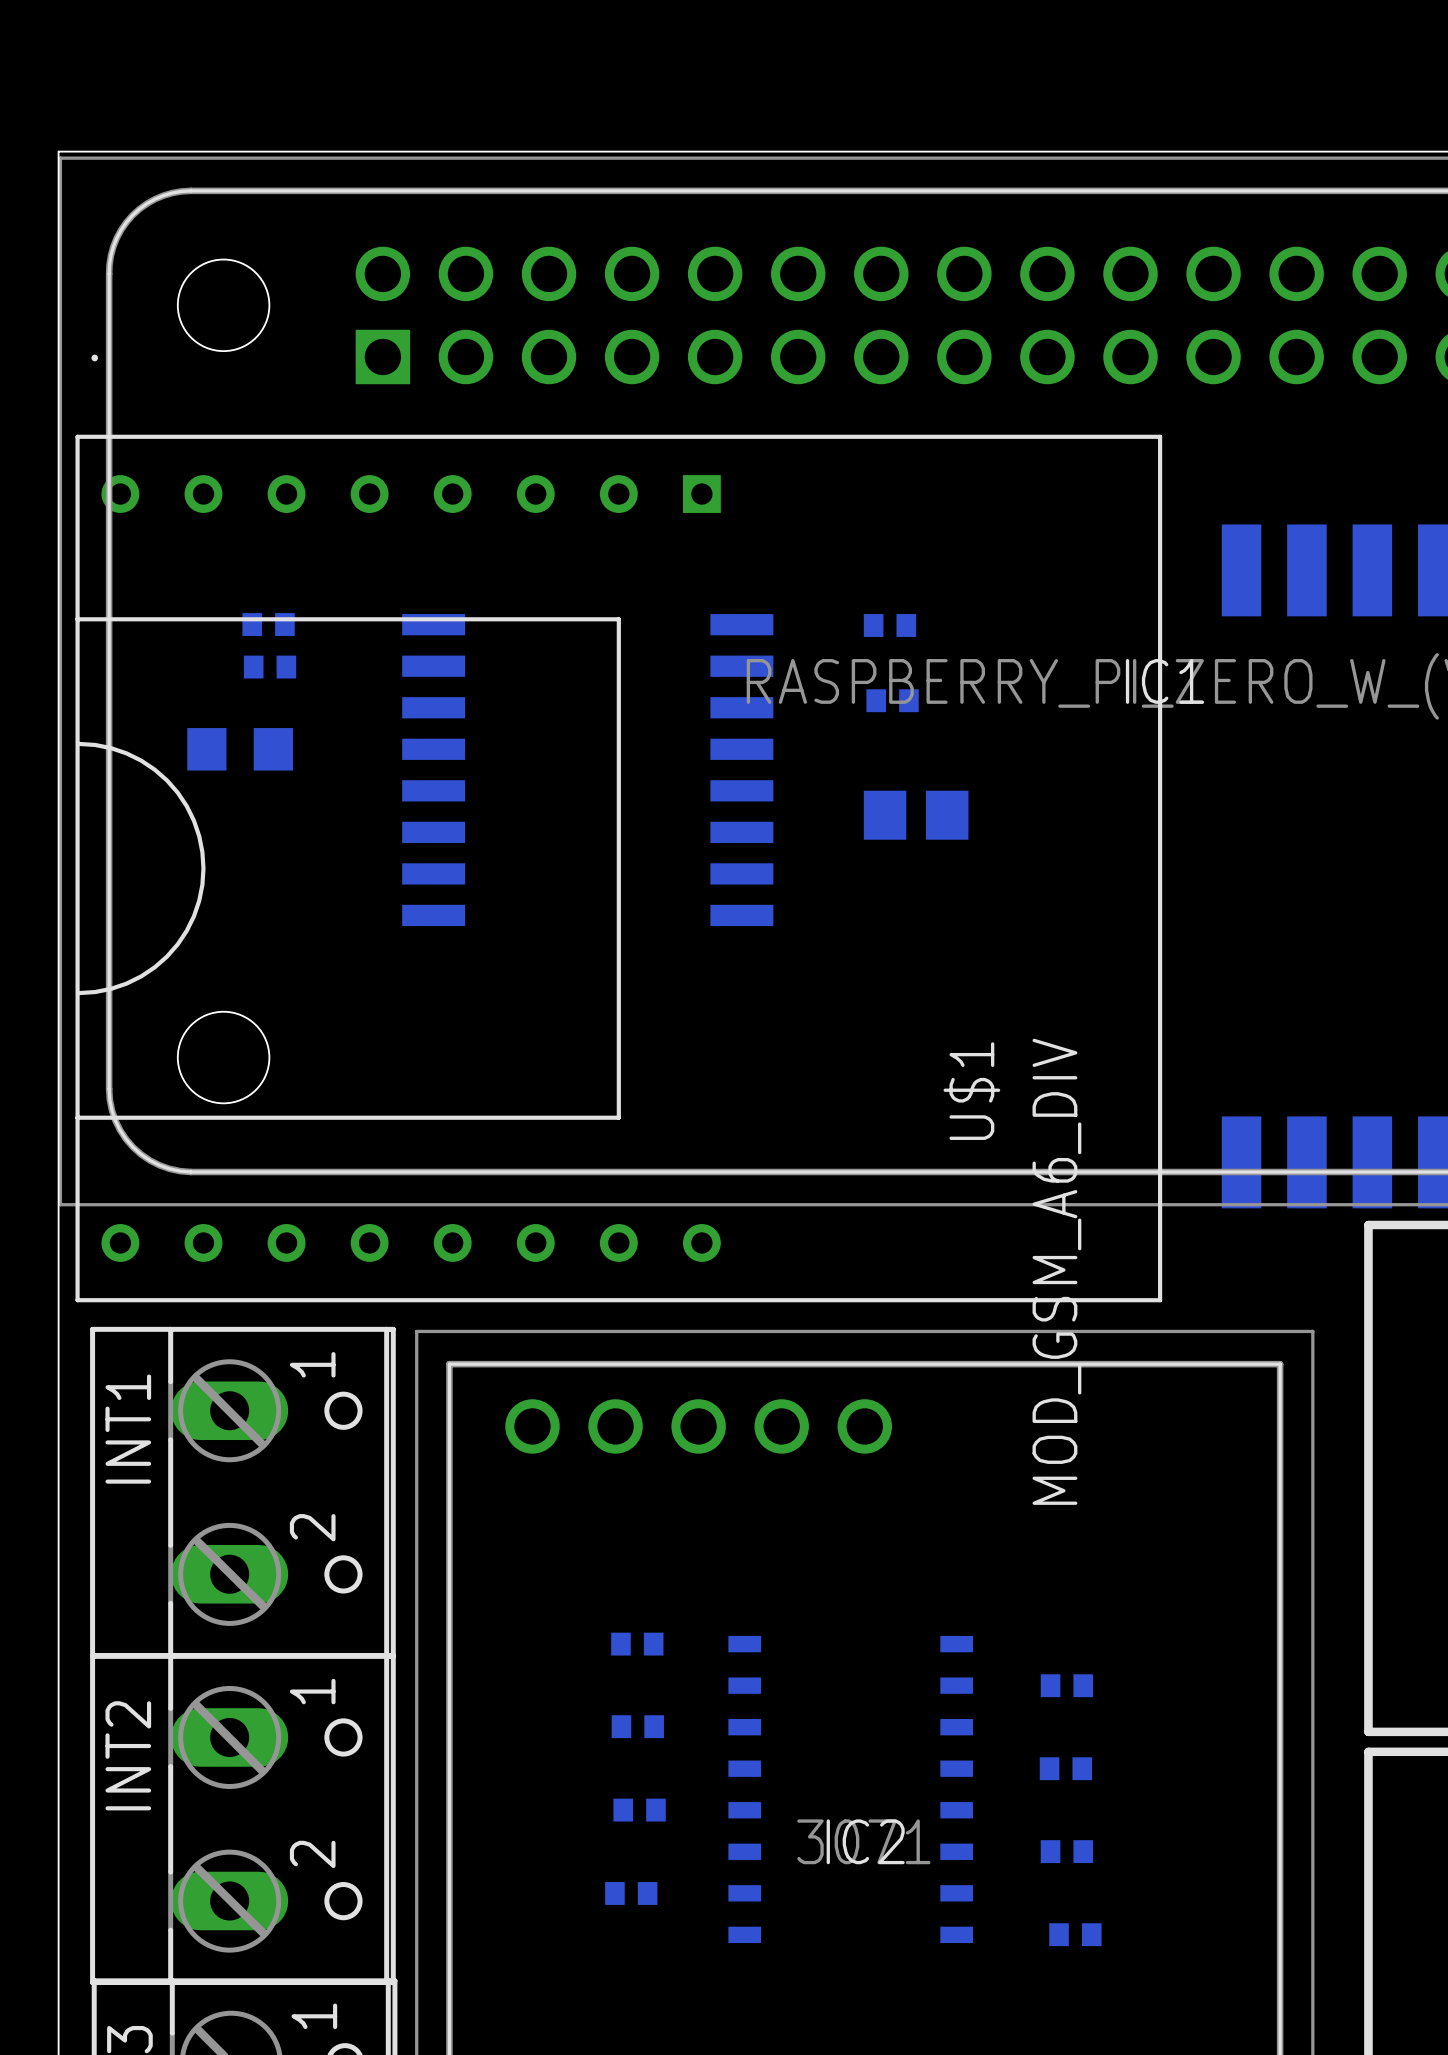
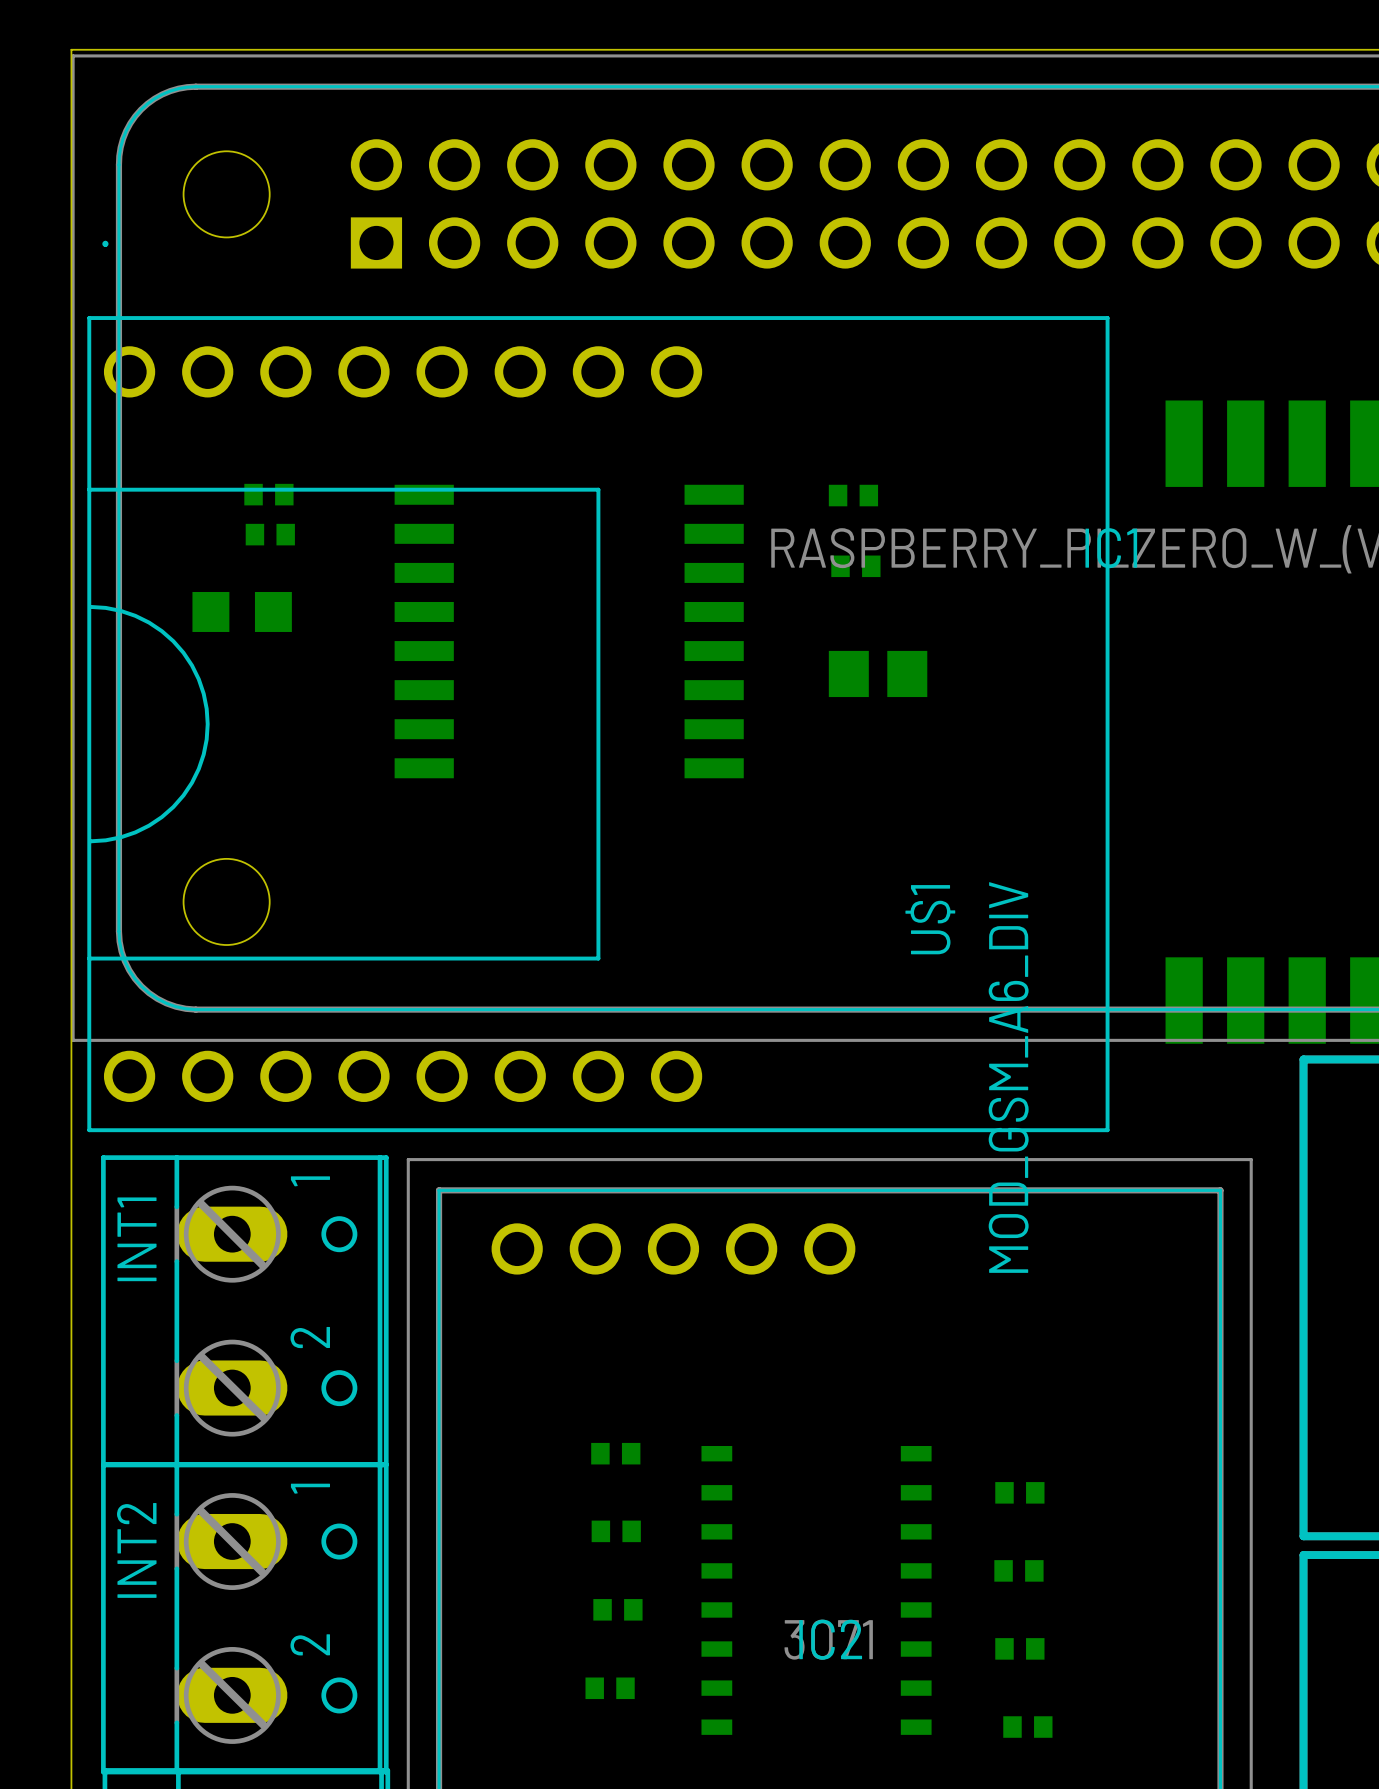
U$1 footprint: [75, 434, 1163, 1303] -> [87, 316, 1110, 1133]

